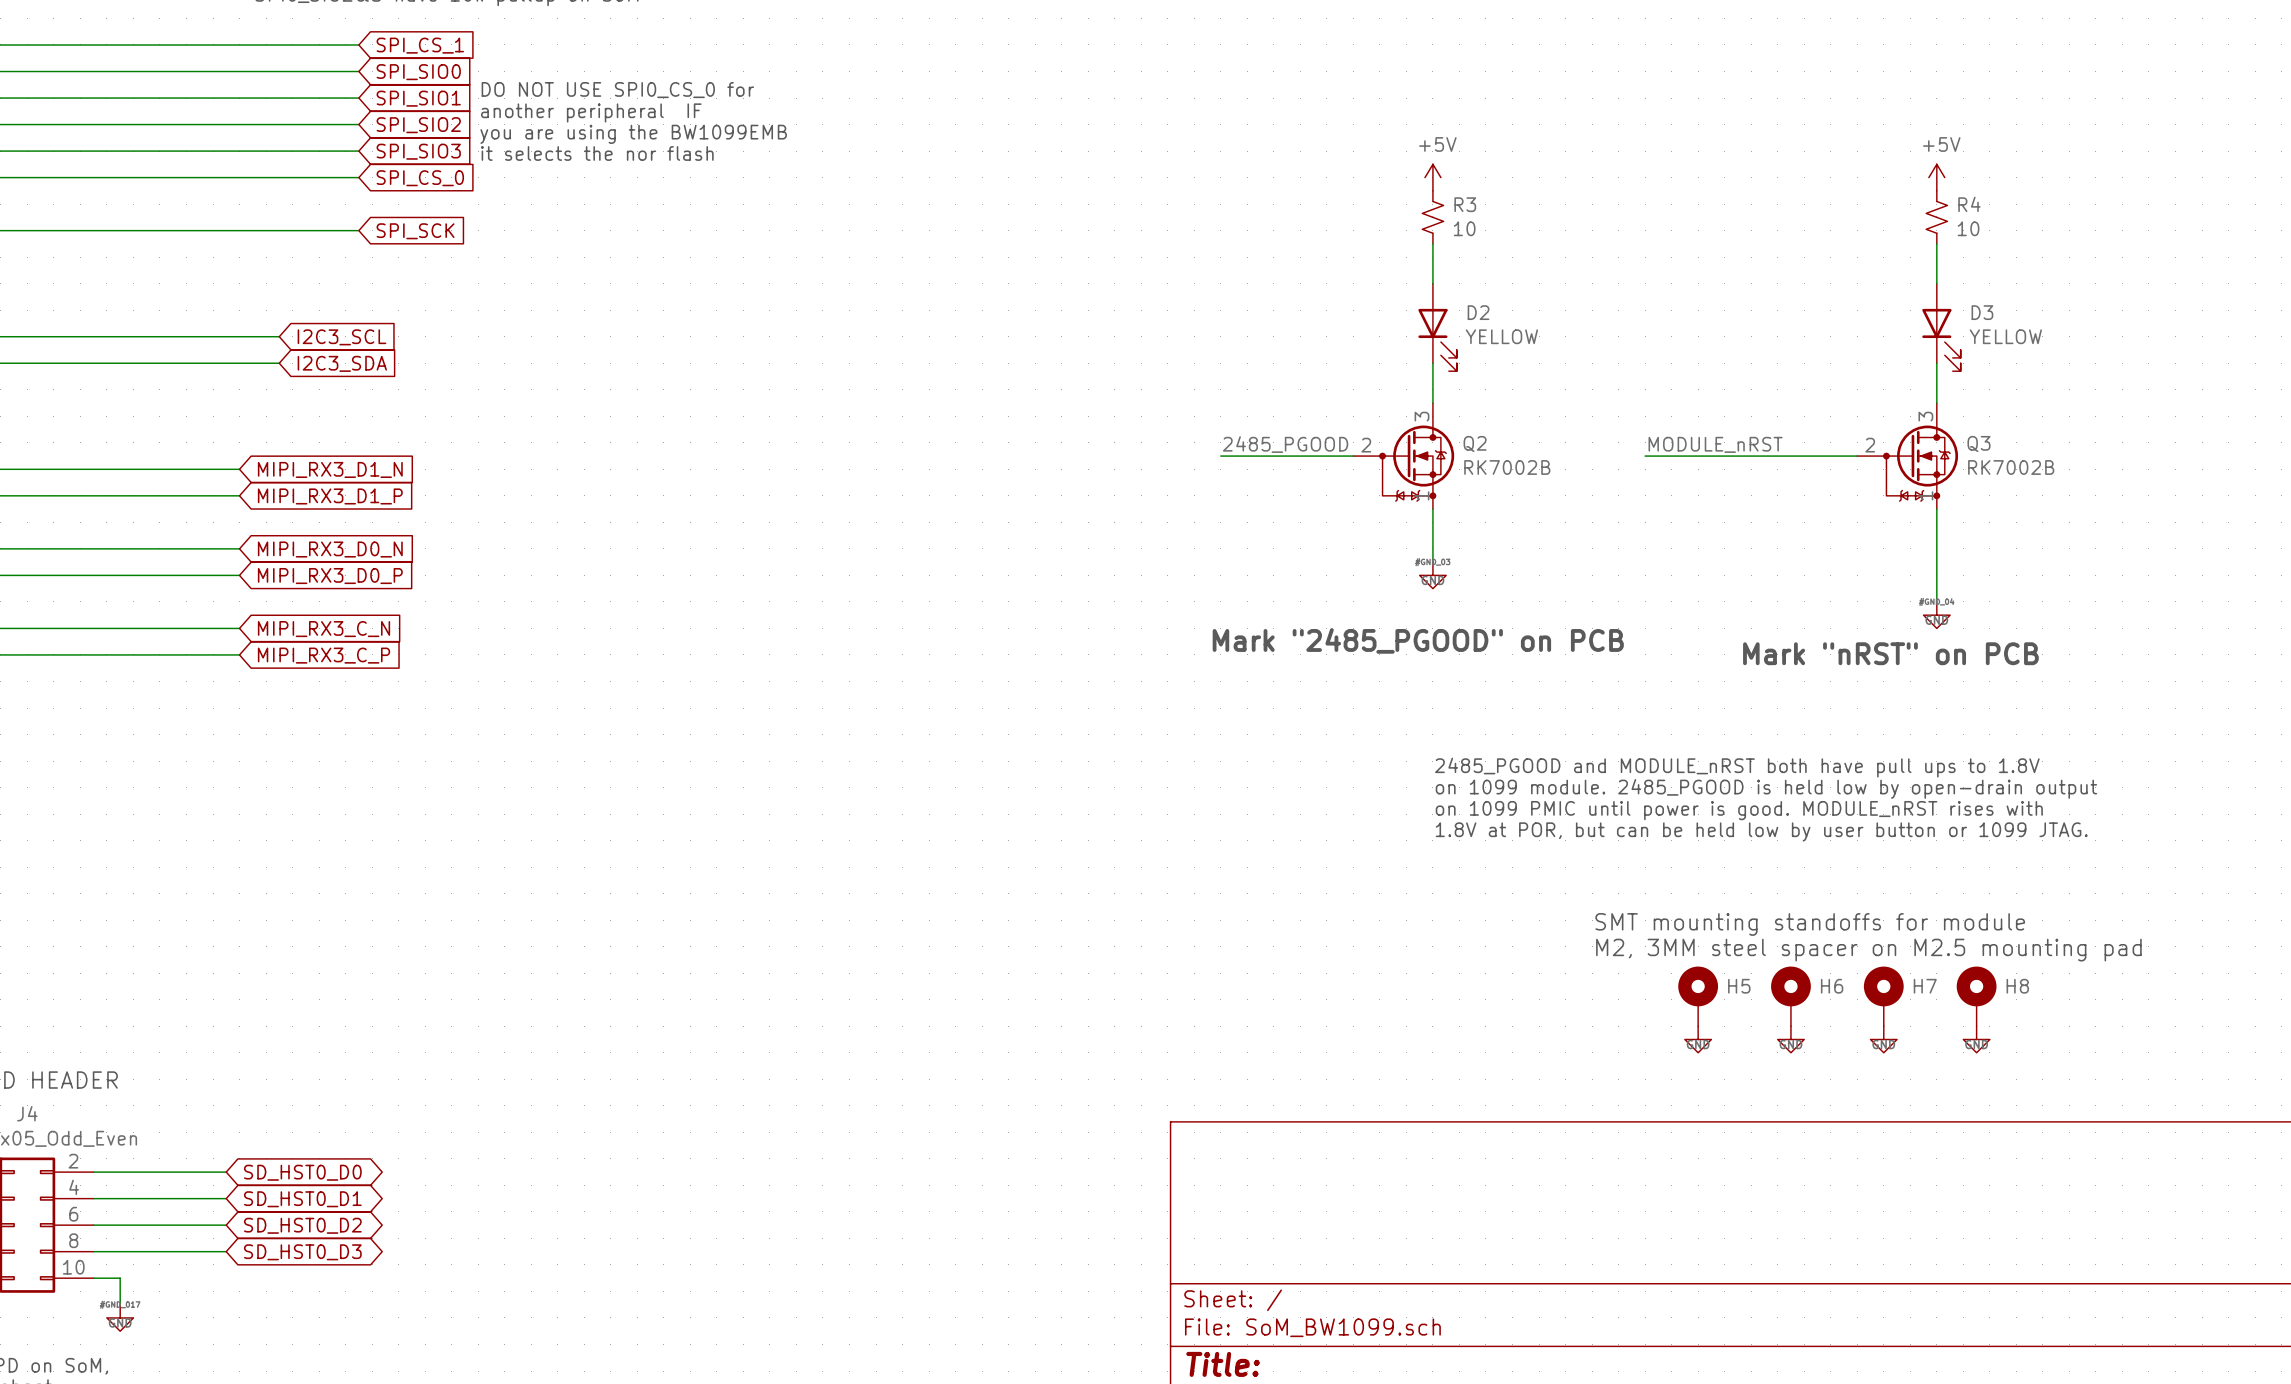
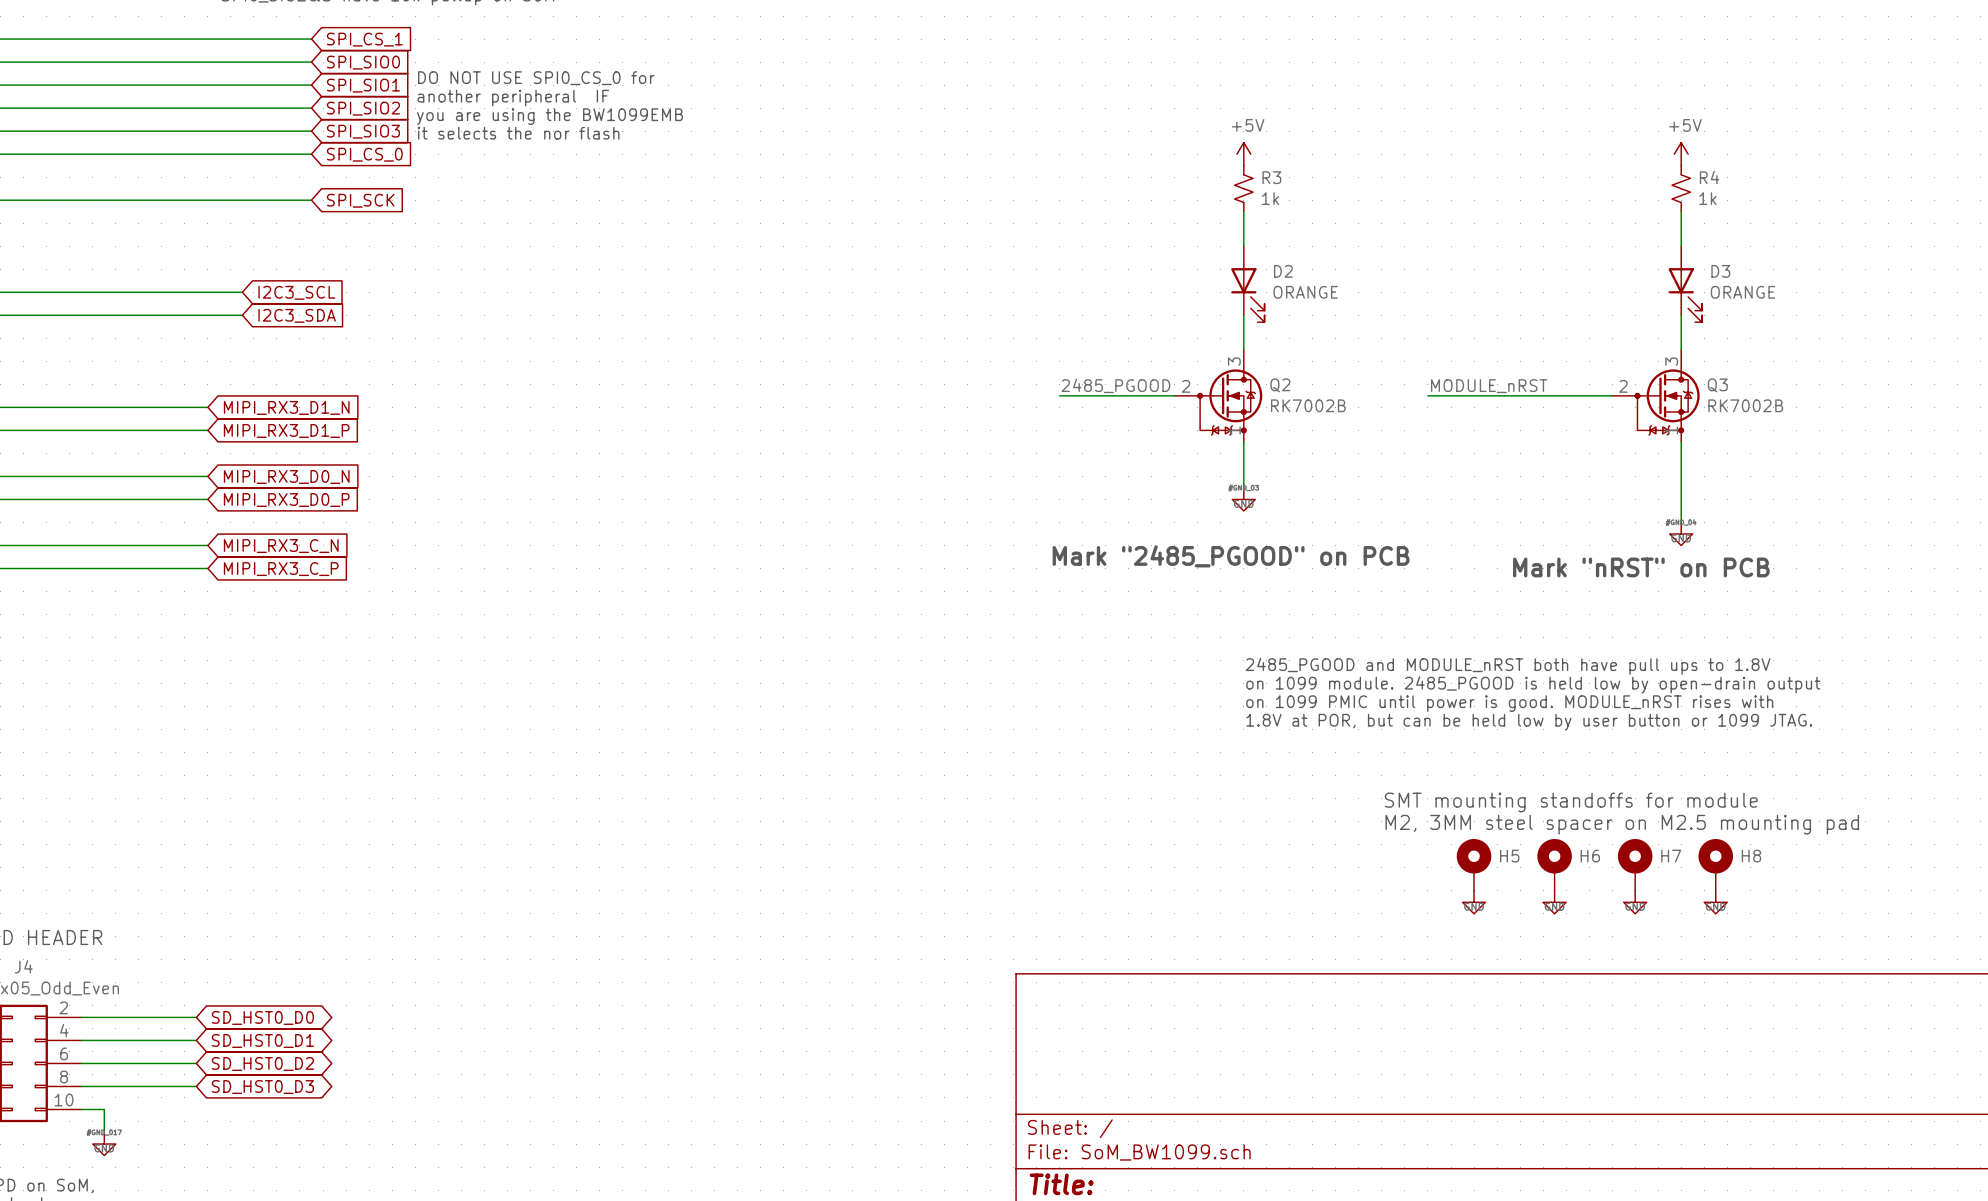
R3 value: 10 (1464, 228) -> 1k (1270, 198)
R4 value: 10 (1968, 228) -> 1k (1707, 198)
D2 value: YELLOW (1501, 336) -> ORANGE (1305, 292)
D3 value: YELLOW (2005, 336) -> ORANGE (1742, 292)

